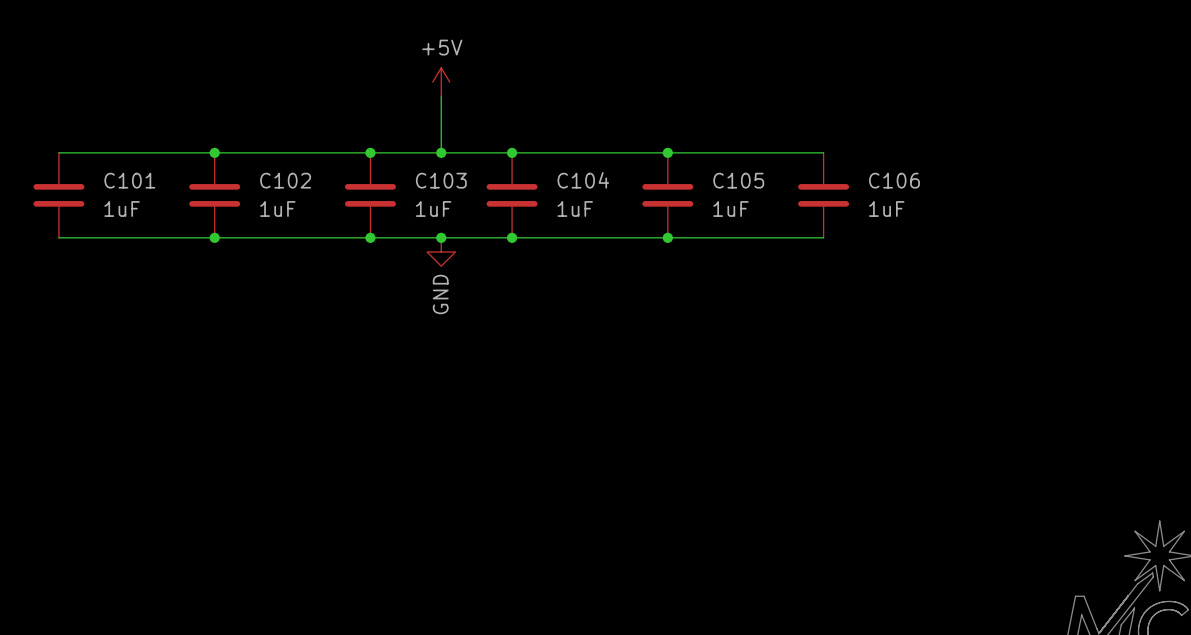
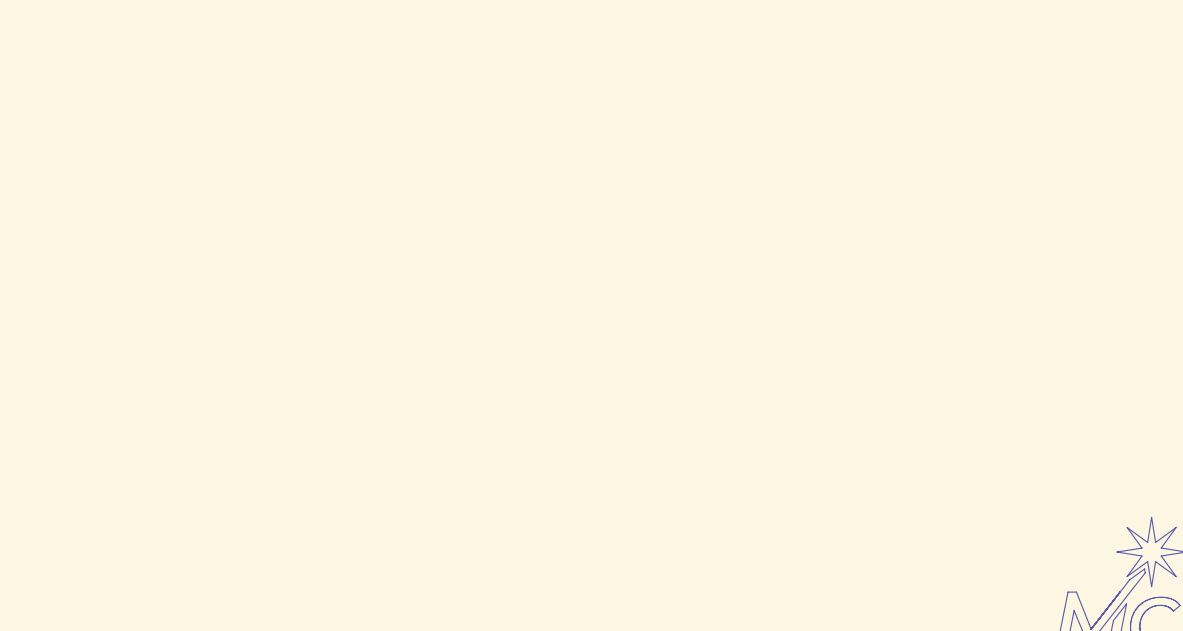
power symbol: +5V (441, 82) -> none
wire: (441, 96) (441, 152) -> none
wire: (58, 152) (823, 152) -> none
junction: (214, 152) -> none
junction: (370, 152) -> none
junction: (441, 152) -> none
junction: (512, 152) -> none
junction: (667, 152) -> none
C101: 1uF (58, 195) -> none
C102: 1uF (214, 195) -> none
C103: 1uF (370, 195) -> none
C104: 1uF (512, 195) -> none
C105: 1uF (667, 195) -> none
C106: 1uF (823, 195) -> none
wire: (58, 237) (823, 237) -> none
junction: (214, 237) -> none
junction: (370, 237) -> none
junction: (441, 237) -> none
junction: (512, 237) -> none
junction: (667, 237) -> none
power symbol: GND (441, 252) -> none

